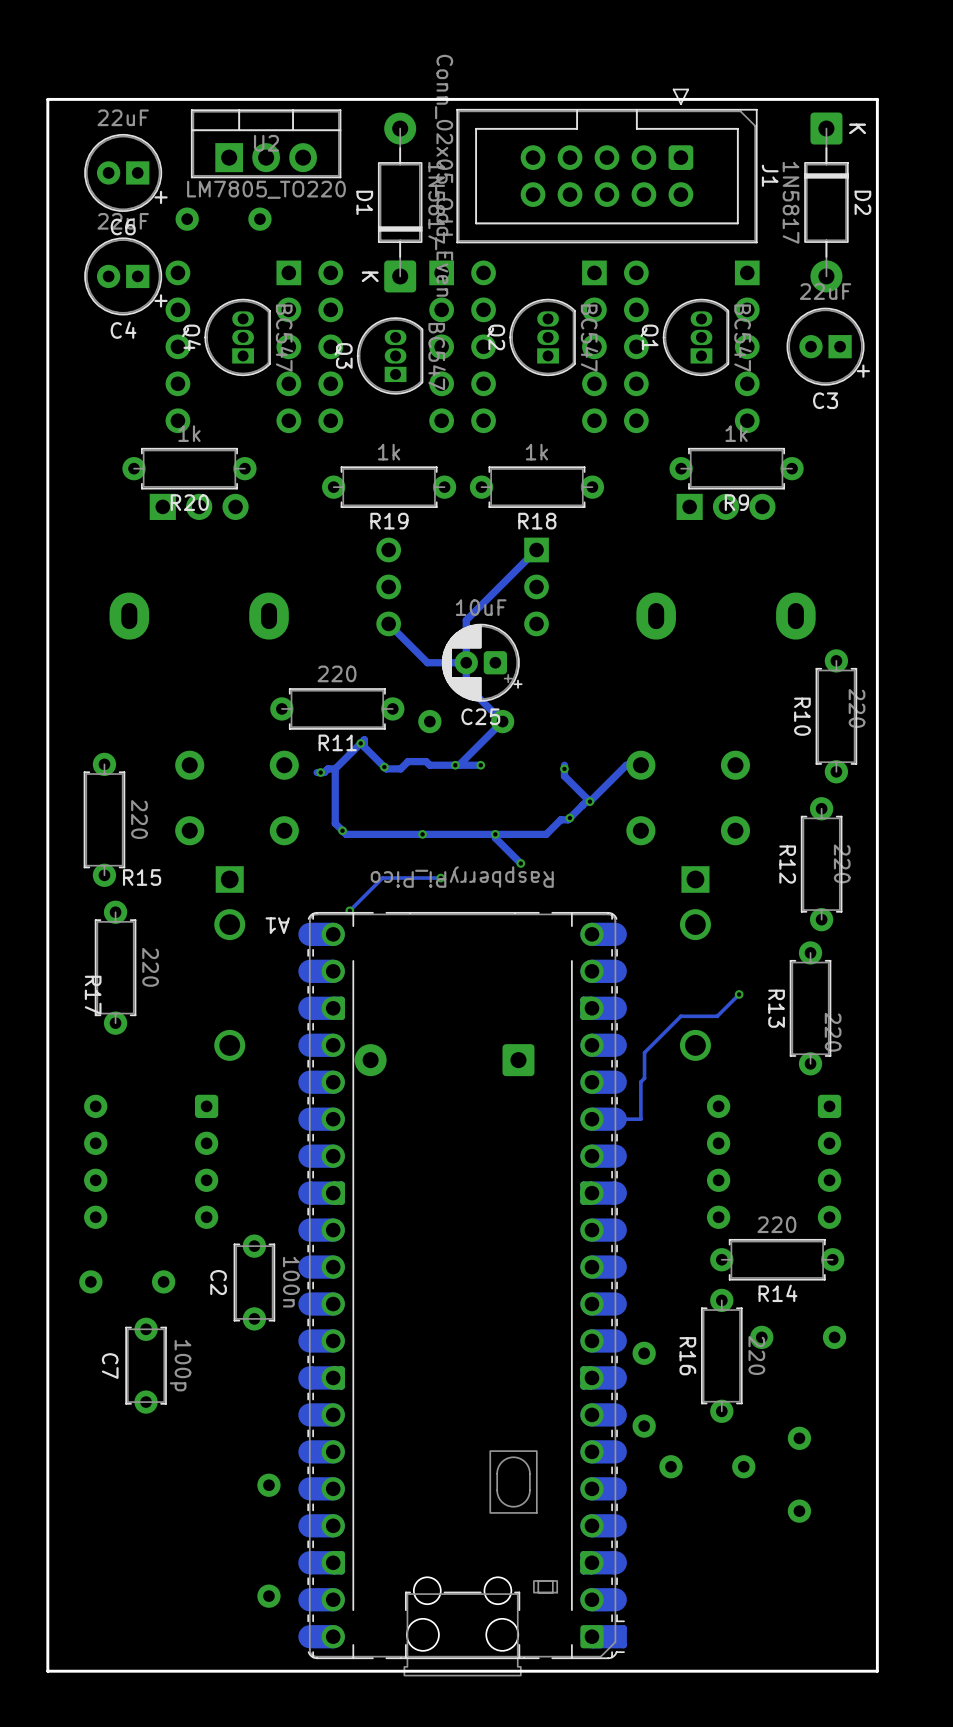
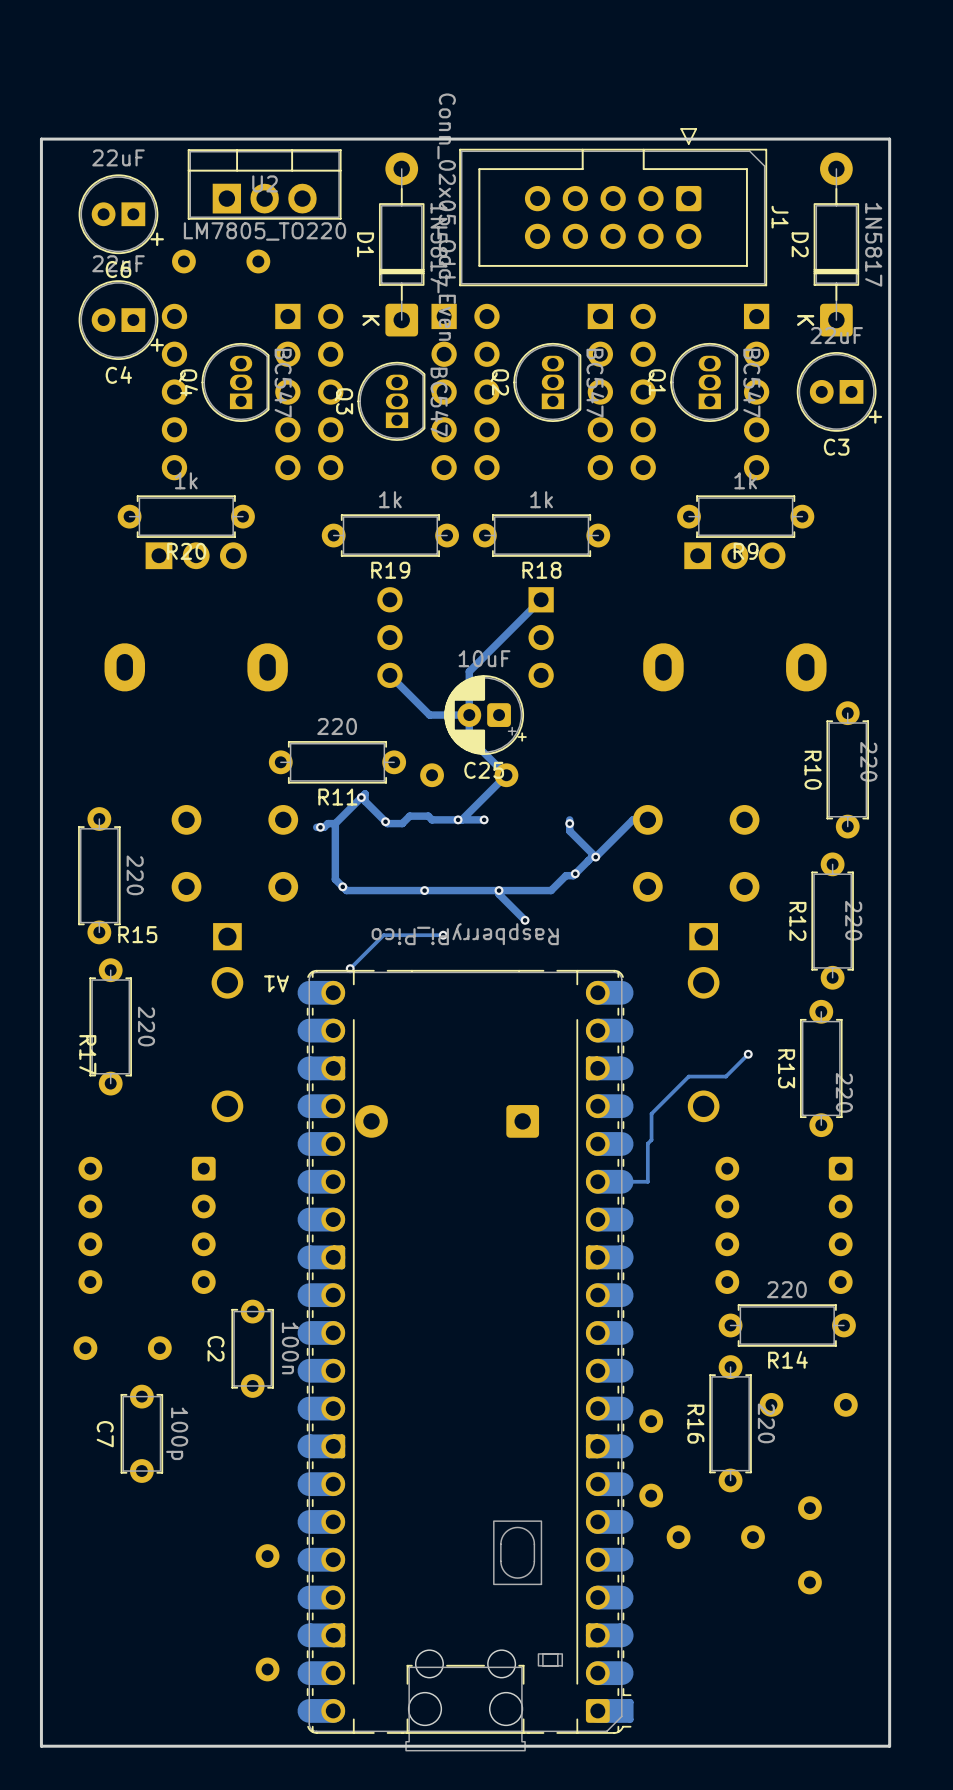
D2 rotation: 0° (826, 202) -> 180° (836, 244)

